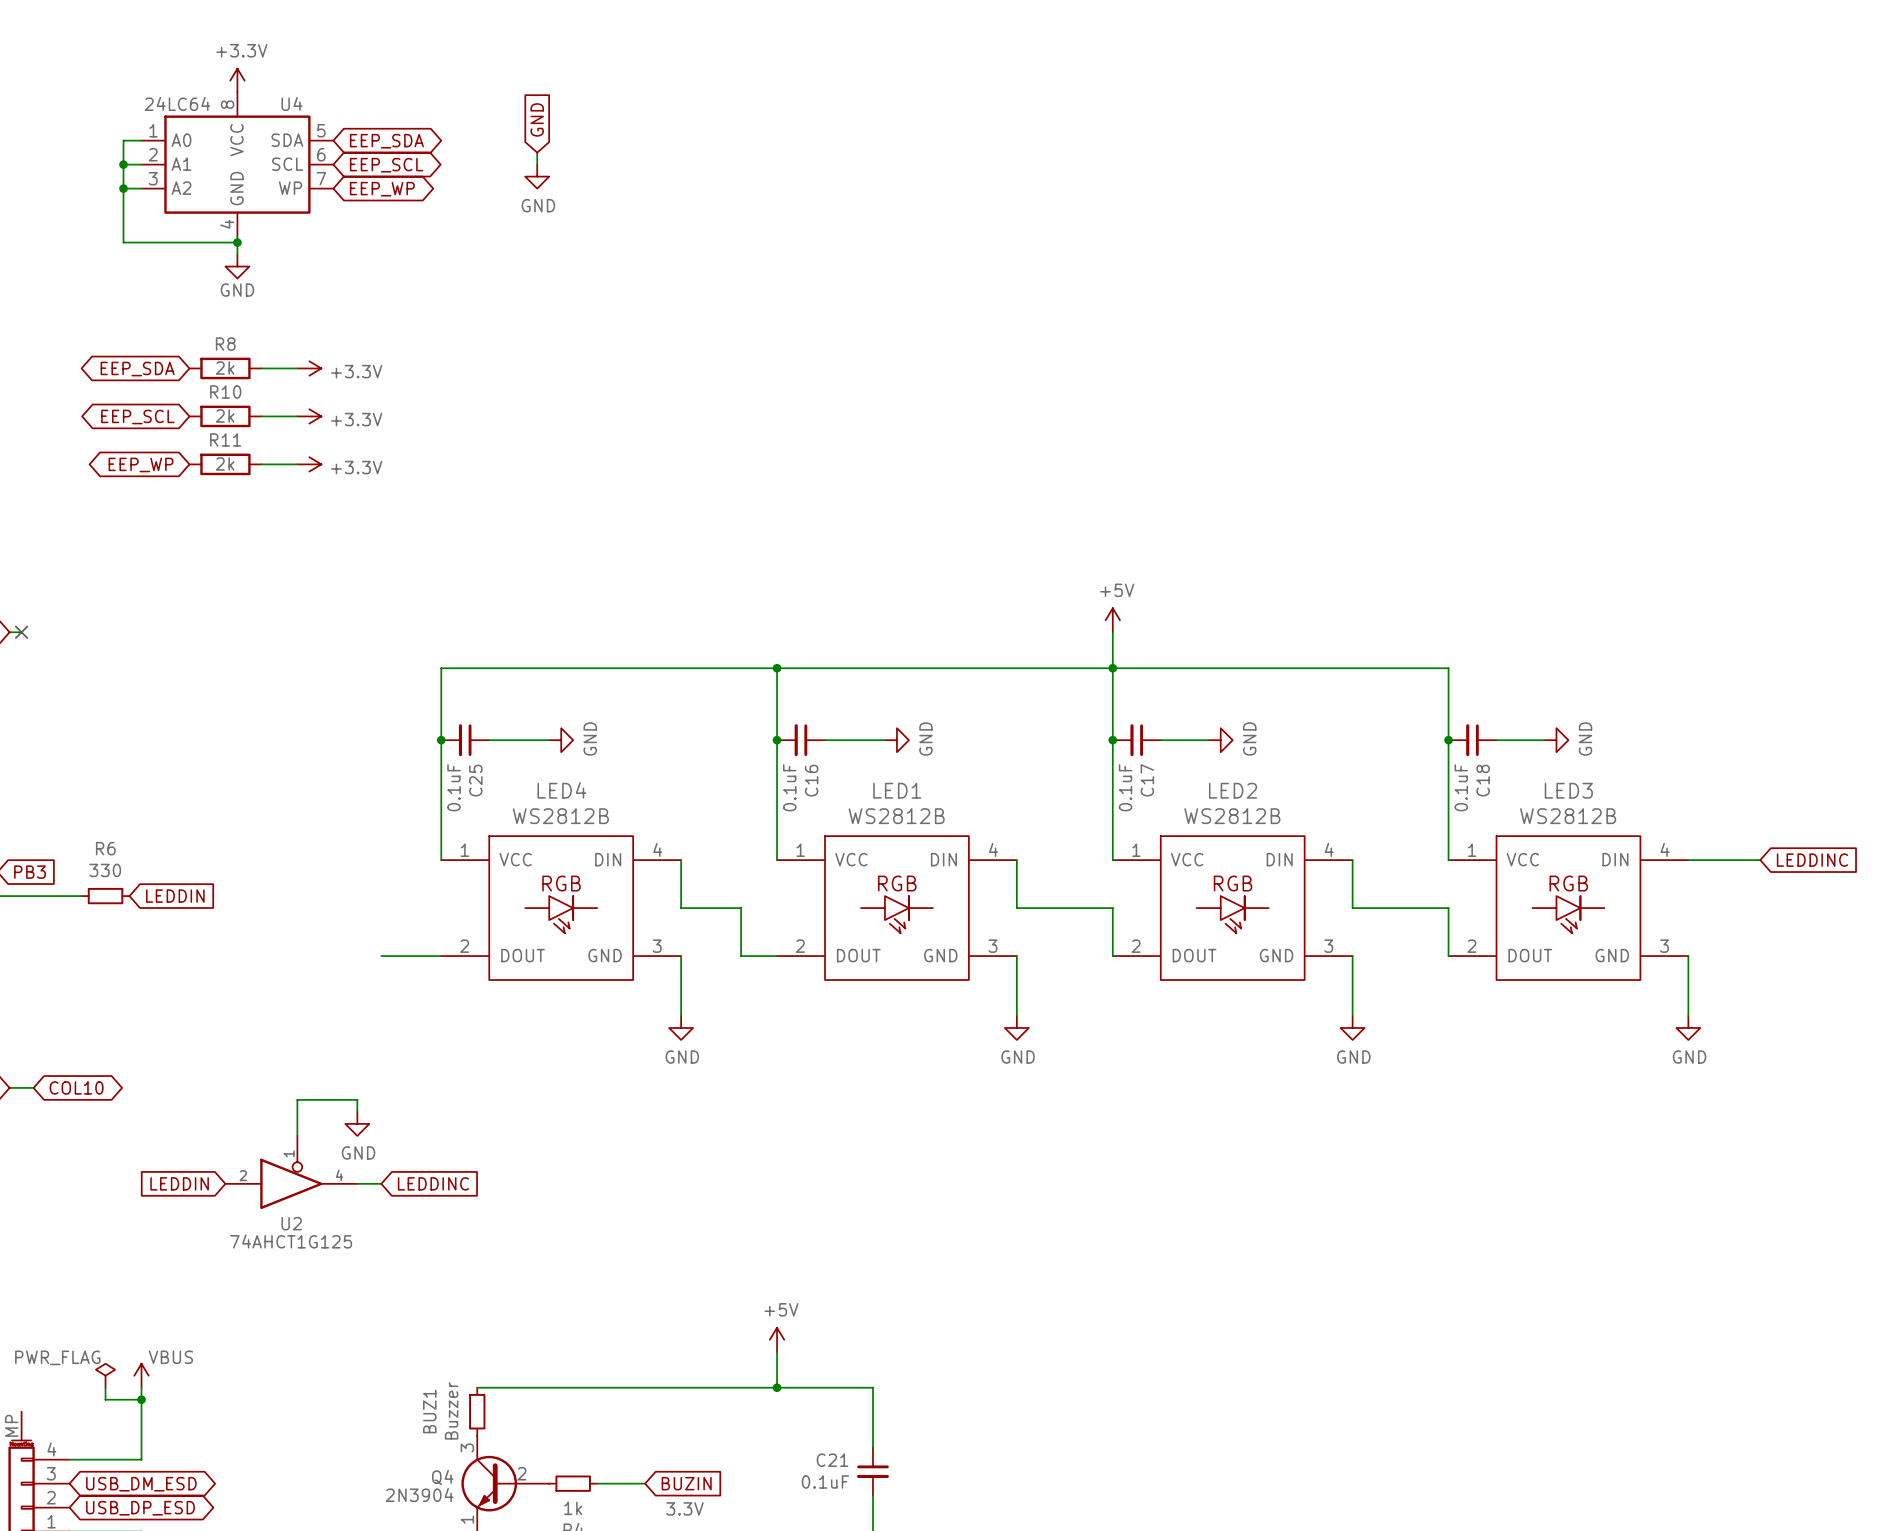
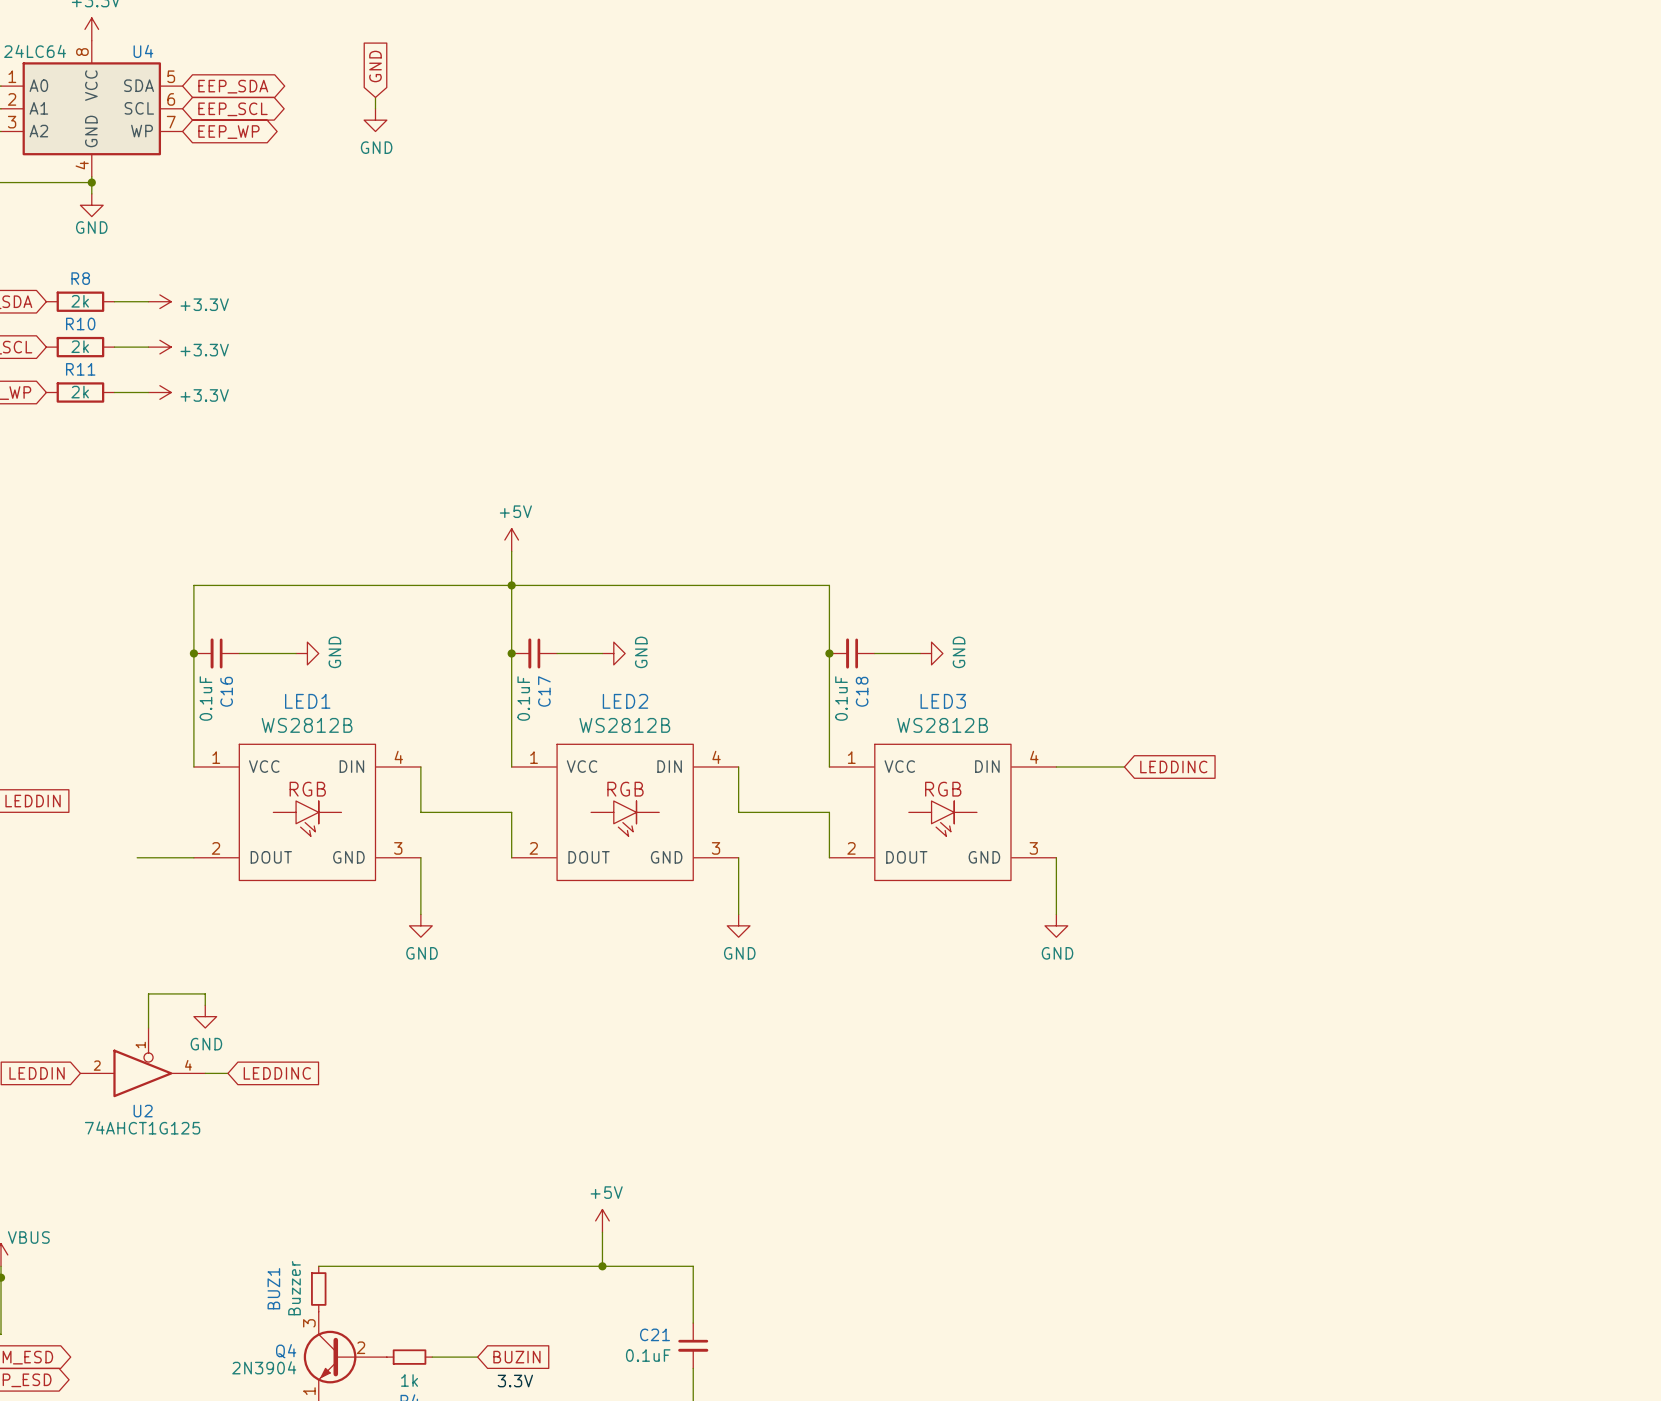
power symbol: none -> +5V (511, 540)
power symbol: +5V (1112, 620) -> none
wire: (1112, 632) (1112, 860) -> none
wire: (441, 668) (441, 860) -> (284, 585) (193, 585) (193, 766)
junction: none -> (511, 585)
wire: (777, 668) (777, 860) -> none
junction: (777, 668) -> none
wire: (1016, 668) (1448, 668) (1448, 860) -> none
junction: (1112, 668) -> none
junction: none -> (193, 653)
junction: (441, 740) -> none
C25: 0.1uF (465, 740) -> none
wire: (489, 740) (549, 740) -> (239, 653) (296, 653)
power symbol position: GND (561, 740) -> GND (307, 653)
junction: none -> (511, 653)
wire: none -> (557, 653) (602, 653)
junction: (777, 740) -> none
C16 position: (801, 740) -> (216, 653)
wire: (825, 740) (884, 740) -> none
power symbol position: GND (896, 740) -> GND (613, 653)
junction: none -> (829, 653)
junction: (1112, 740) -> none
C17 position: (1136, 740) -> (534, 653)
wire: (1160, 740) (1208, 740) -> (874, 653) (920, 653)
power symbol position: GND (1220, 740) -> GND (931, 653)
junction: (1448, 740) -> none
C18 position: (1472, 740) -> (852, 653)
wire: (1496, 740) (1544, 740) -> none
power symbol: GND (1556, 740) -> none
wire: (681, 860) (681, 908) (741, 908) (741, 956) (777, 956) -> (511, 766) (511, 551)
wire: (1016, 860) (1016, 908) (1112, 908) (1112, 956) -> (829, 766) (829, 585)
wire: none -> (1056, 766) (1124, 766)
wire: (1352, 860) (1352, 908) (1448, 908) (1448, 956) -> none
global label: none -> LEDDINC (1173, 766)
wire: (1688, 860) (1760, 860) -> none
global label: LEDDINC (1812, 860) -> none
LED4: WS2812B (561, 908) -> none
LED1 position: (896, 908) -> (307, 812)
LED2 position: (1232, 908) -> (625, 812)
LED3 position: (1568, 908) -> (942, 812)
wire: (381, 956) (441, 956) -> (137, 857) (193, 857)
wire: none -> (420, 857) (420, 914)
wire: (681, 956) (681, 1015) -> (511, 857) (511, 812) (420, 812) (420, 766)
wire: none -> (738, 857) (738, 914)
wire: (1016, 956) (1016, 1015) -> (829, 857) (829, 812) (738, 812) (738, 766)
wire: (1352, 956) (1352, 1015) -> (1056, 857) (1056, 914)
wire: (1688, 956) (1688, 1015) -> none
power symbol position: GND (681, 1027) -> GND (420, 925)
power symbol position: GND (1016, 1027) -> GND (738, 925)
power symbol position: GND (1352, 1027) -> GND (1056, 925)
power symbol: GND (1688, 1027) -> none

